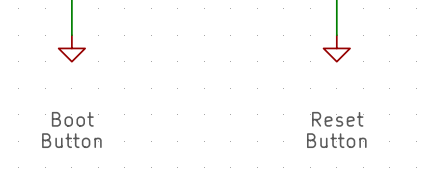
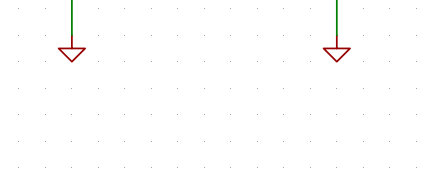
text: Boot (72, 119) -> none
text: Reset (337, 119) -> none
text: Button (71, 140) -> none
text: Button (336, 140) -> none

